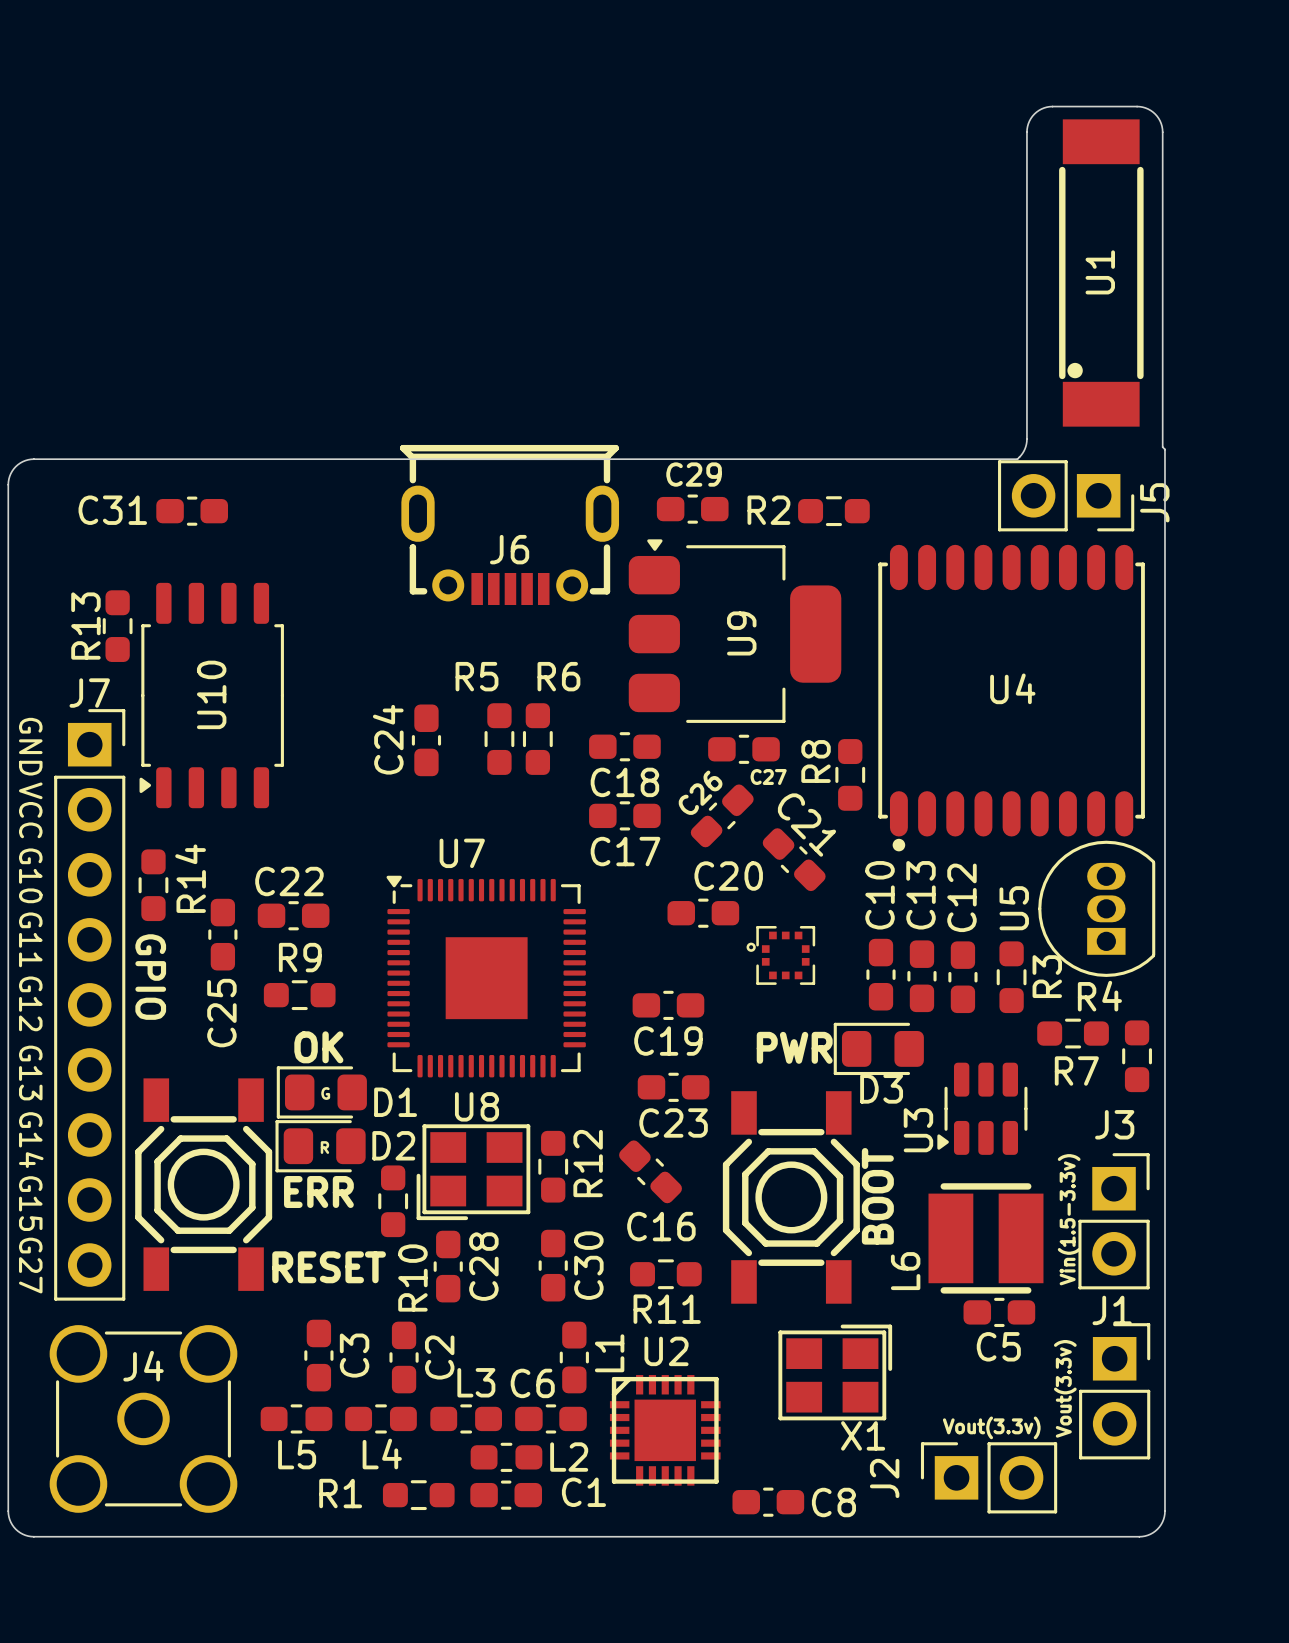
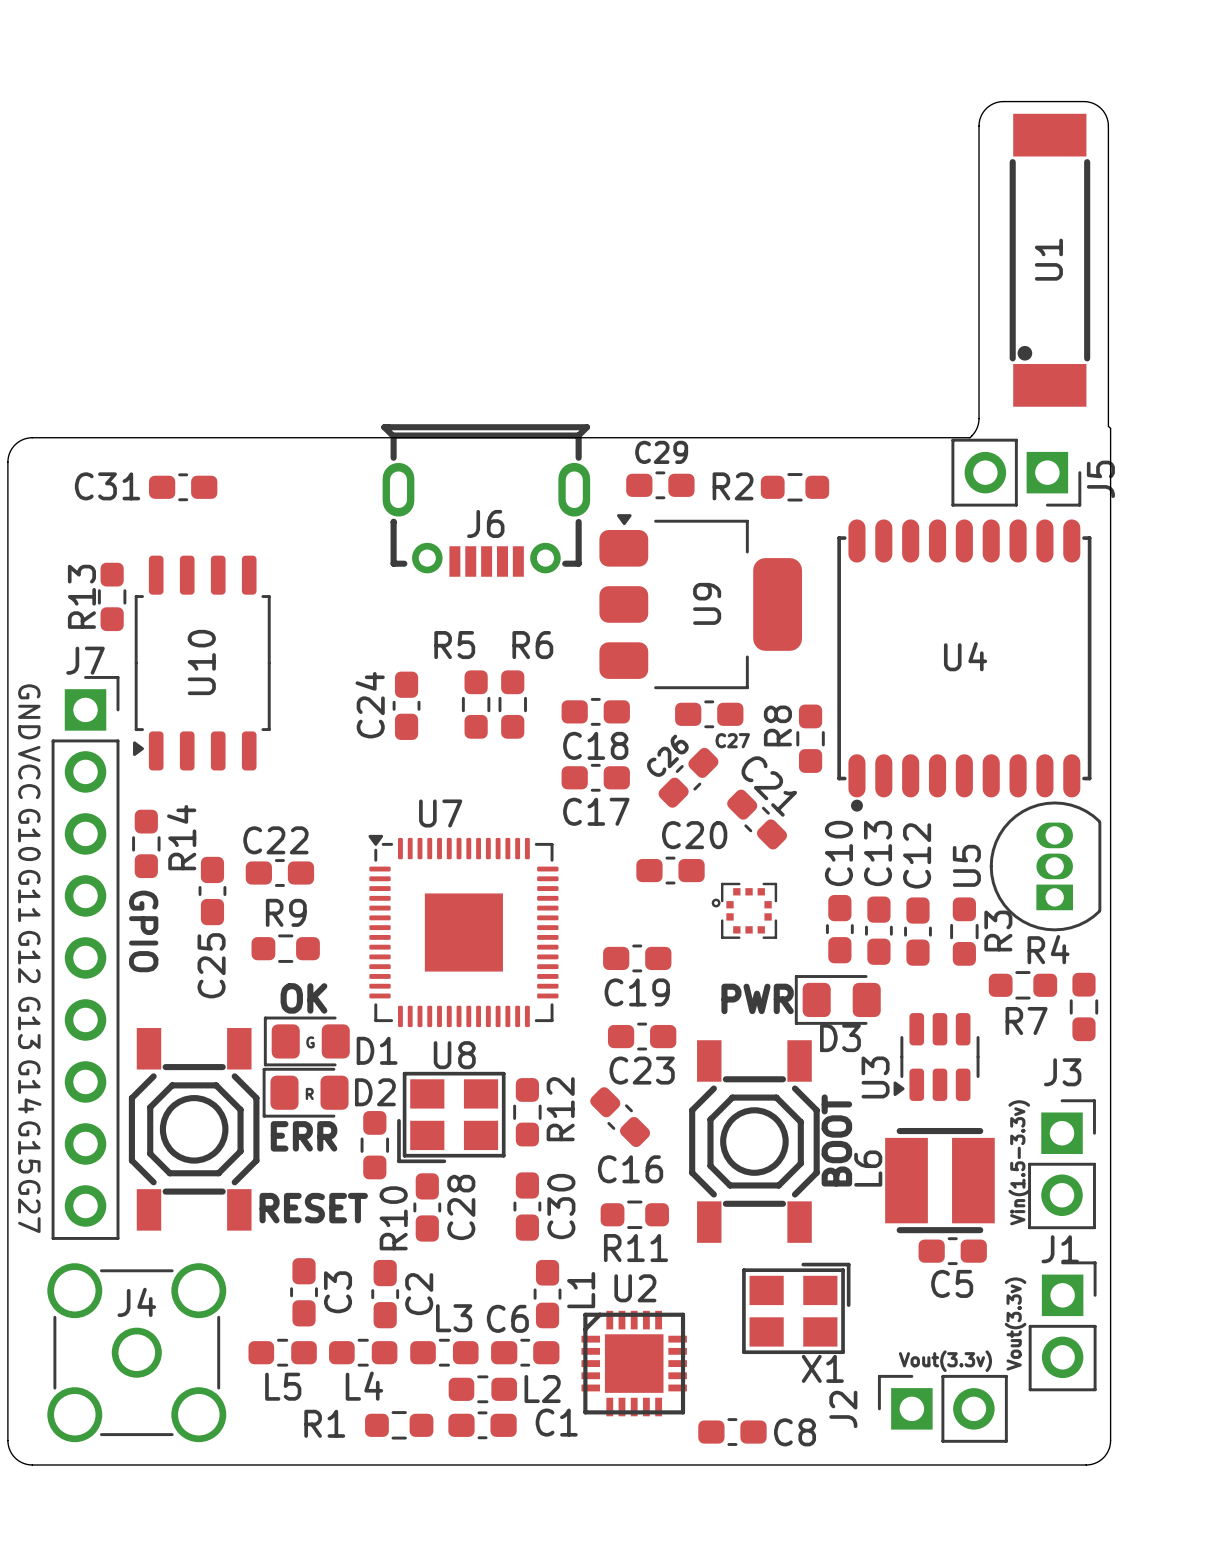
L6 name position: L6 (905, 1271) -> L6 (868, 1168)

